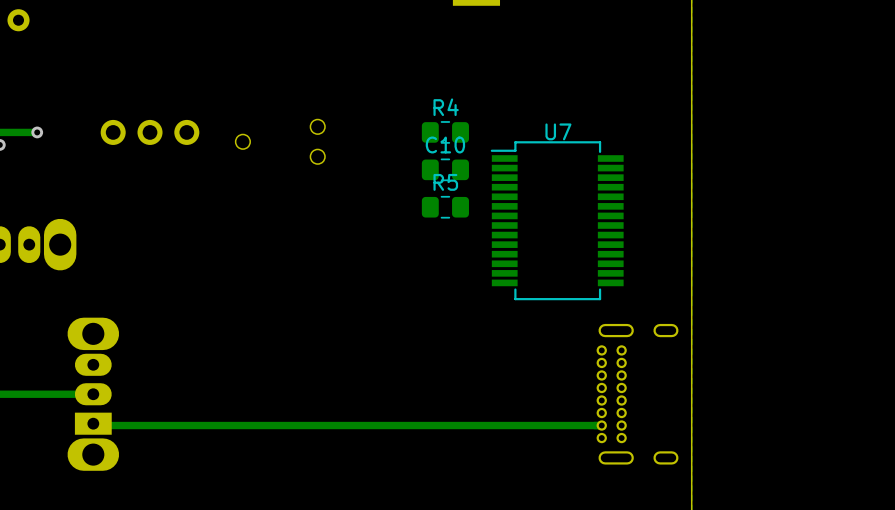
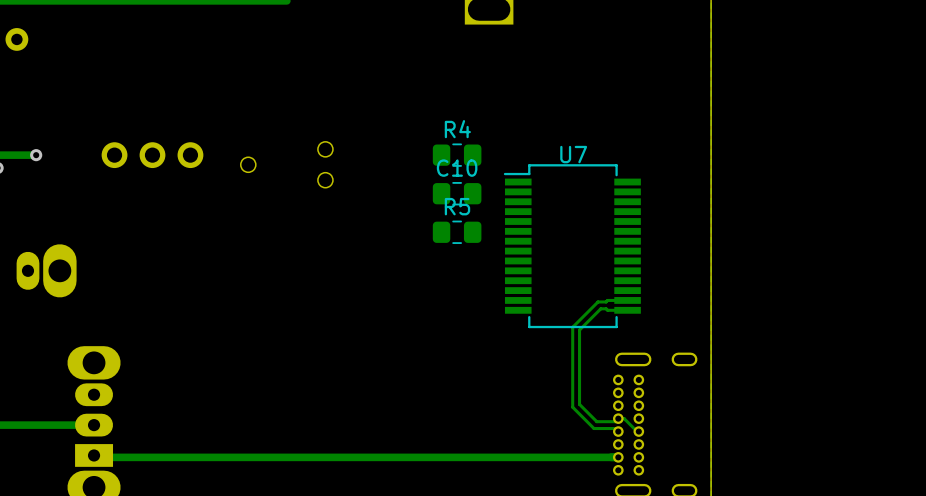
track: none -> (627, 300) (598, 301) (572, 327) (572, 407) (593, 428) (615, 428) (618, 431)
track: none -> (627, 310) (600, 308) (579, 330) (579, 404) (596, 421) (615, 421) (618, 418) (624, 418) (638, 431)

